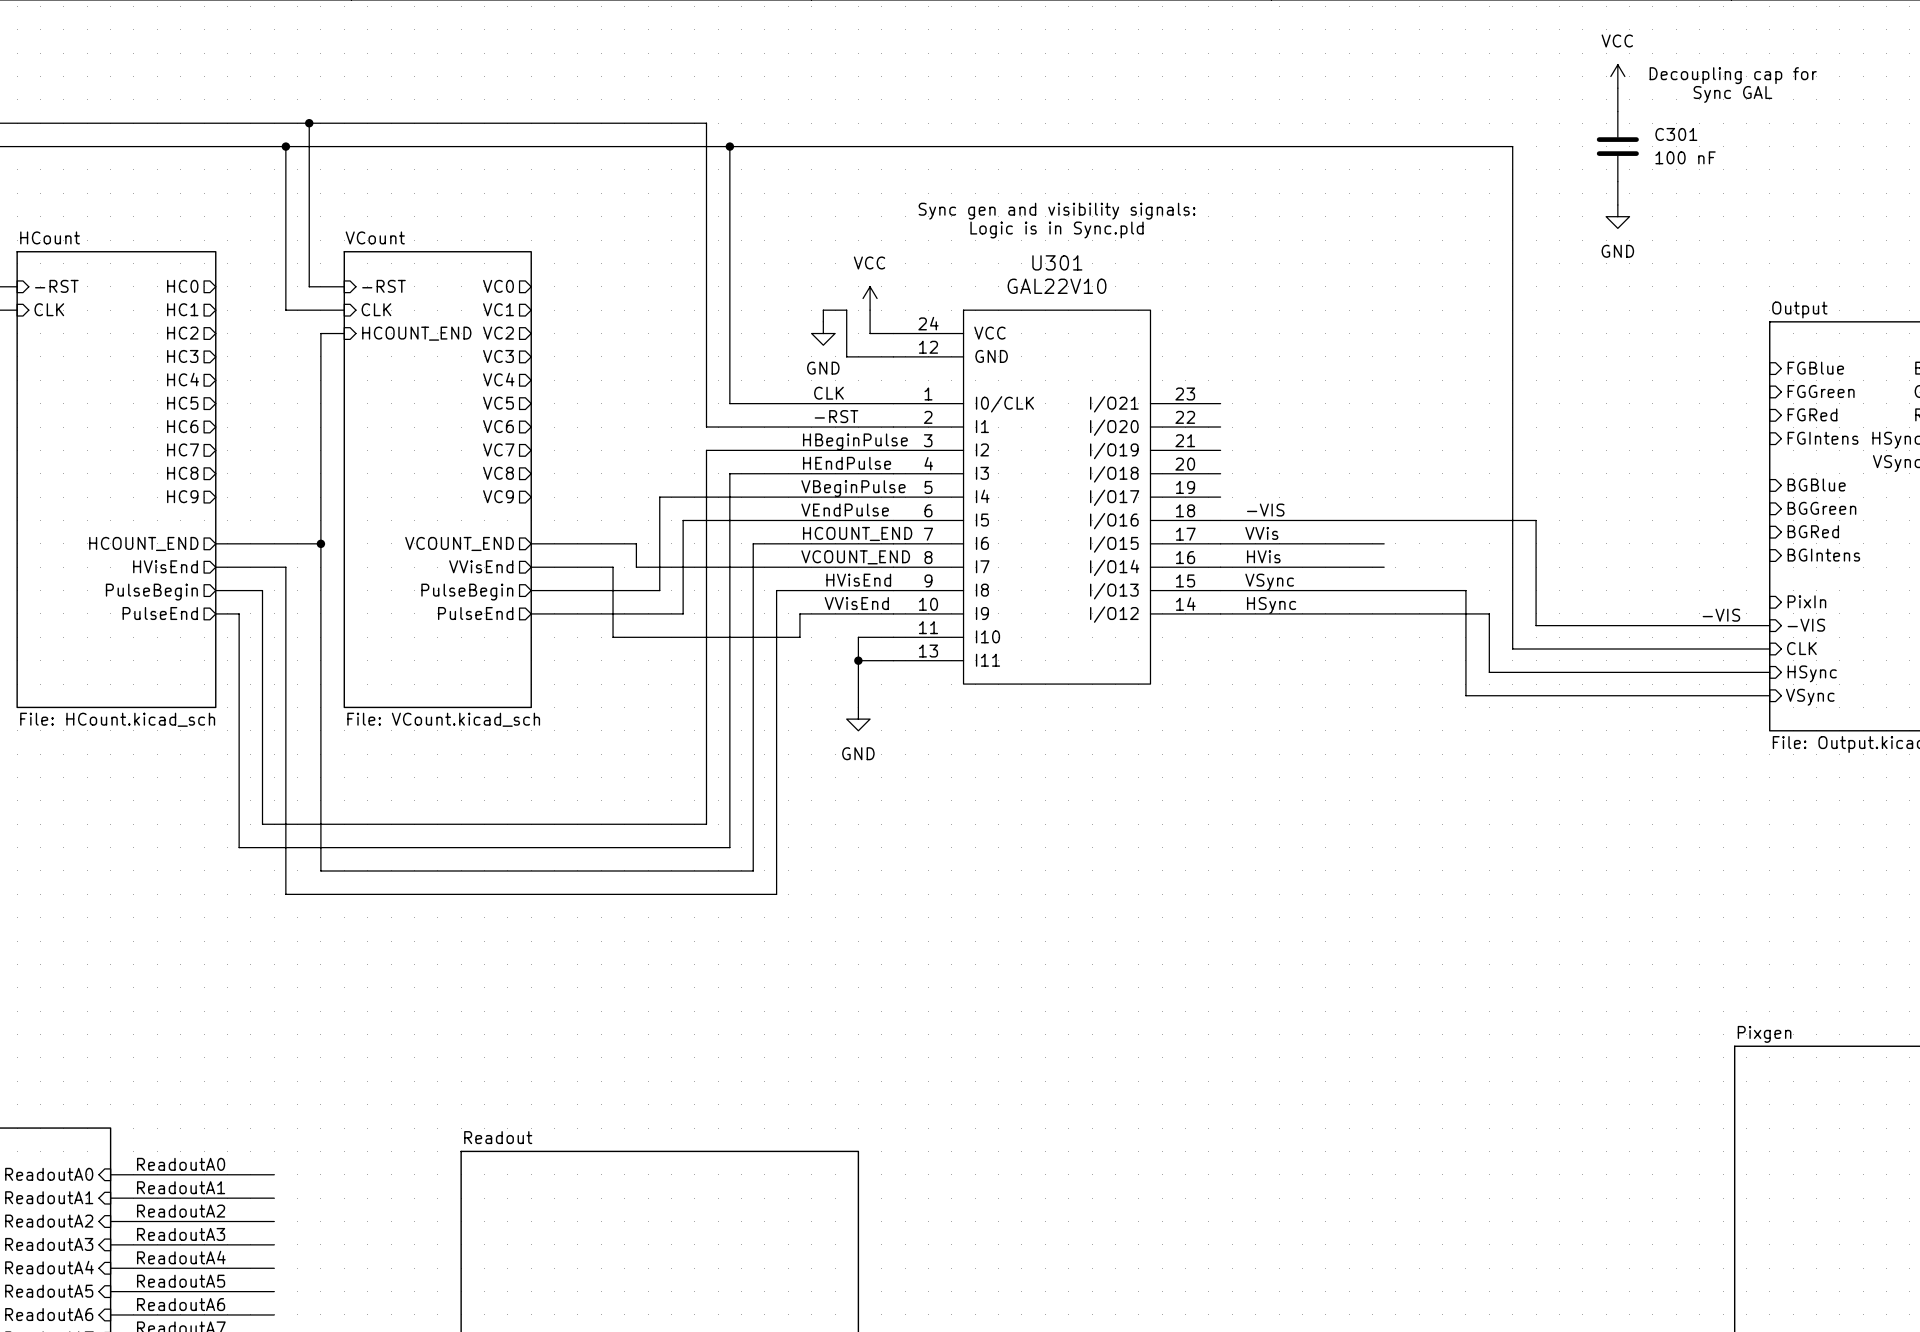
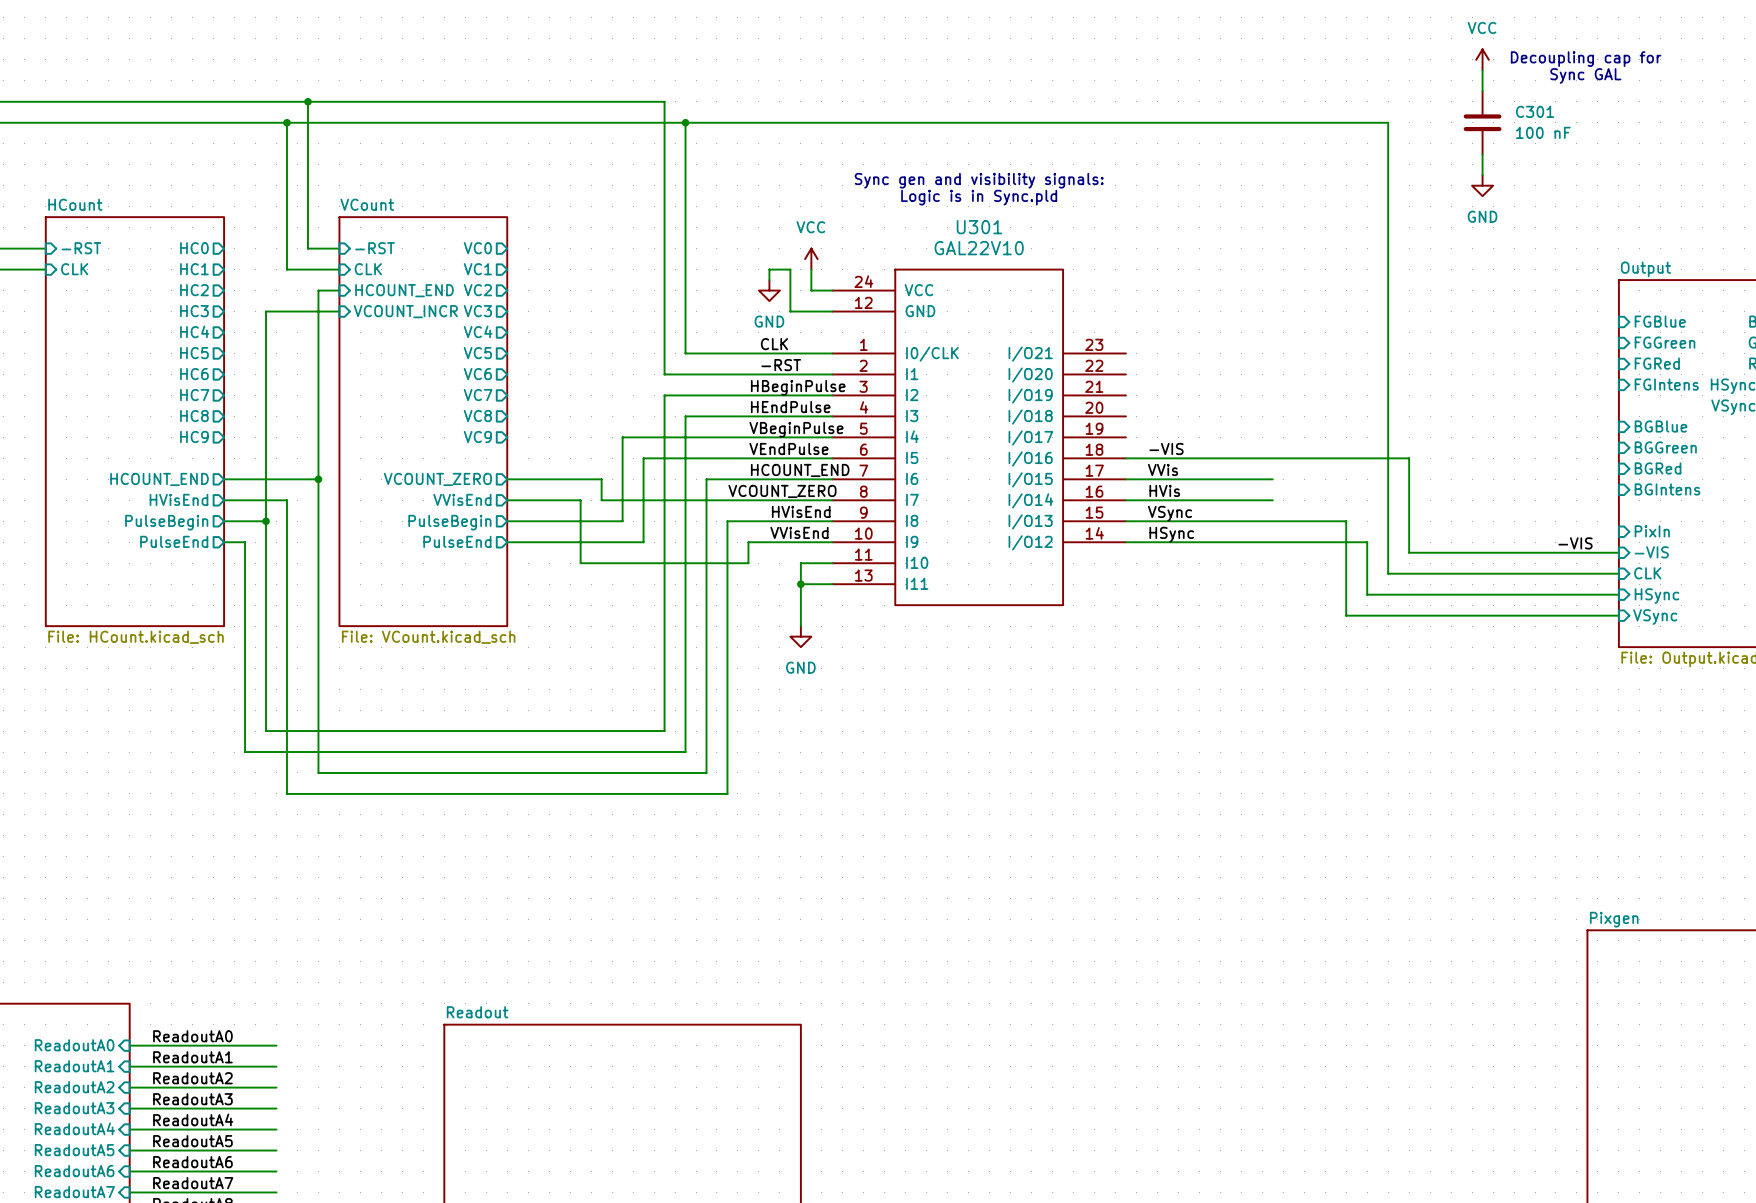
wire: none -> (339, 311) (266, 311) (266, 521)
sheet pin: none -> VCOUNT_INCR (405, 311)
sheet pin: VCOUNT_END (459, 543) -> VCOUNT_ZERO (437, 479)
label: VCOUNT_END (855, 557) -> VCOUNT_ZERO (782, 491)
junction: none -> (266, 521)

